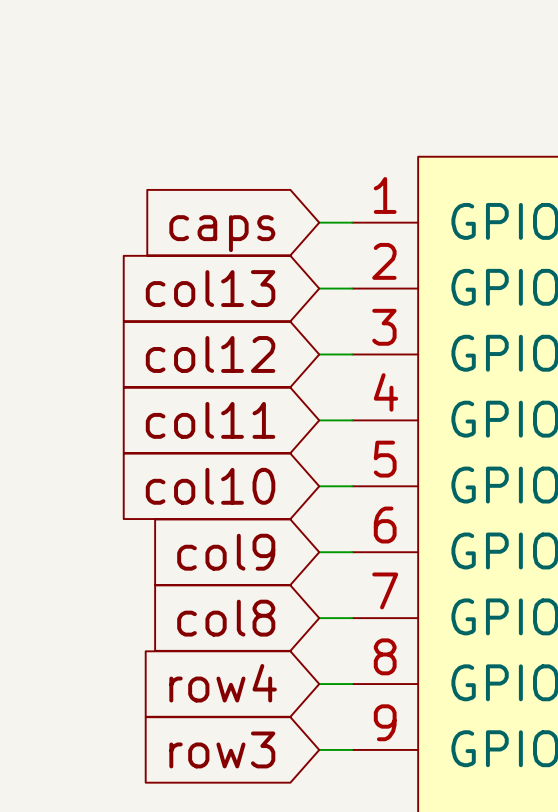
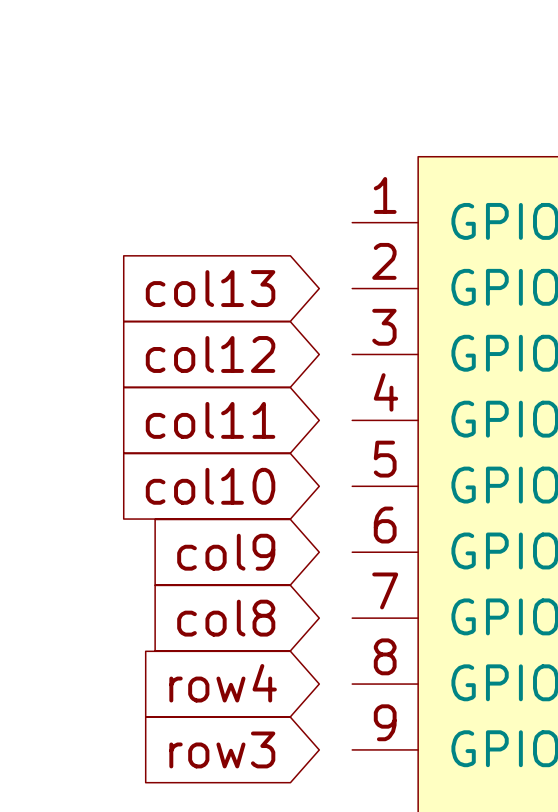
wire: (319, 222) (352, 222) -> none
global label: caps (222, 233) -> none
wire: (319, 288) (352, 288) -> none
wire: (319, 354) (352, 354) -> none
wire: (319, 420) (352, 420) -> none
wire: (319, 486) (352, 486) -> none
wire: (319, 552) (352, 552) -> none
wire: (319, 618) (352, 618) -> none
wire: (319, 684) (352, 684) -> none
wire: (319, 749) (352, 749) -> none

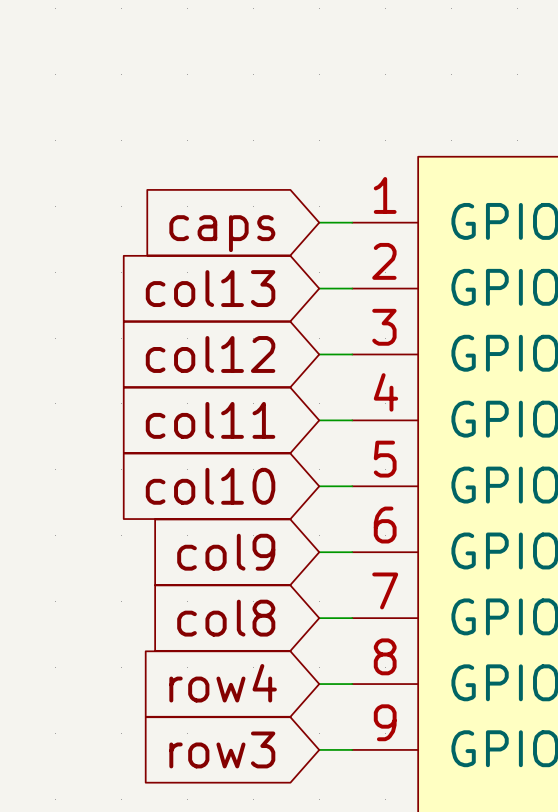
wire: none -> (319, 222) (352, 222)
global label: none -> caps (222, 233)
wire: none -> (319, 288) (352, 288)
wire: none -> (319, 354) (352, 354)
wire: none -> (319, 420) (352, 420)
wire: none -> (319, 486) (352, 486)
wire: none -> (319, 552) (352, 552)
wire: none -> (319, 618) (352, 618)
wire: none -> (319, 684) (352, 684)
wire: none -> (319, 749) (352, 749)

